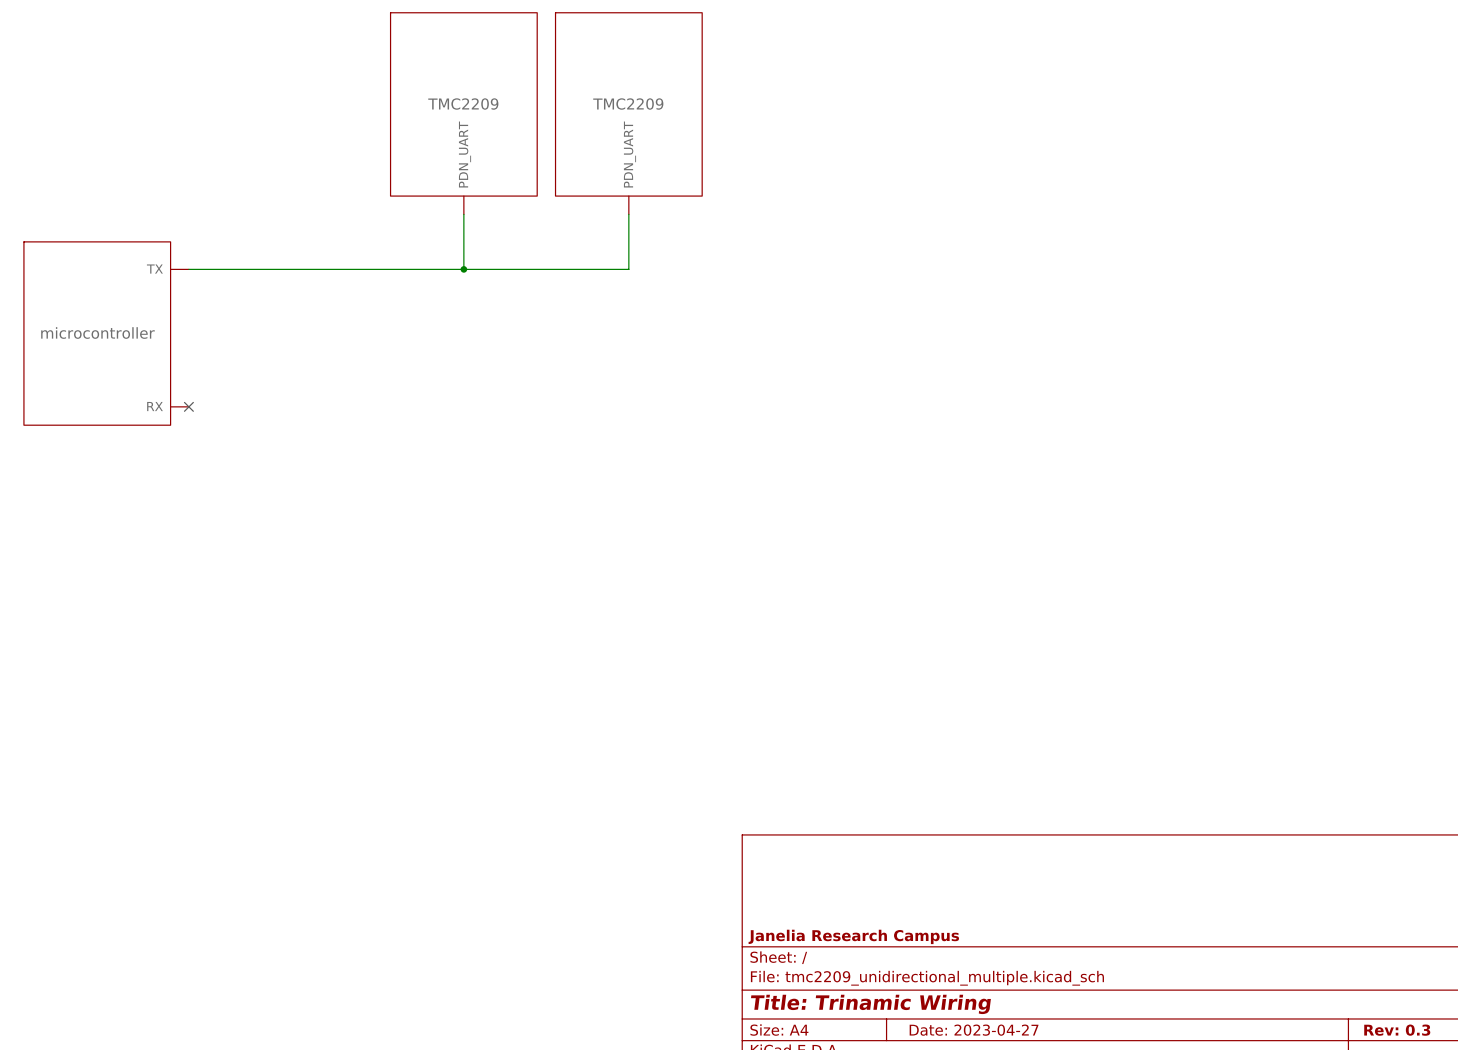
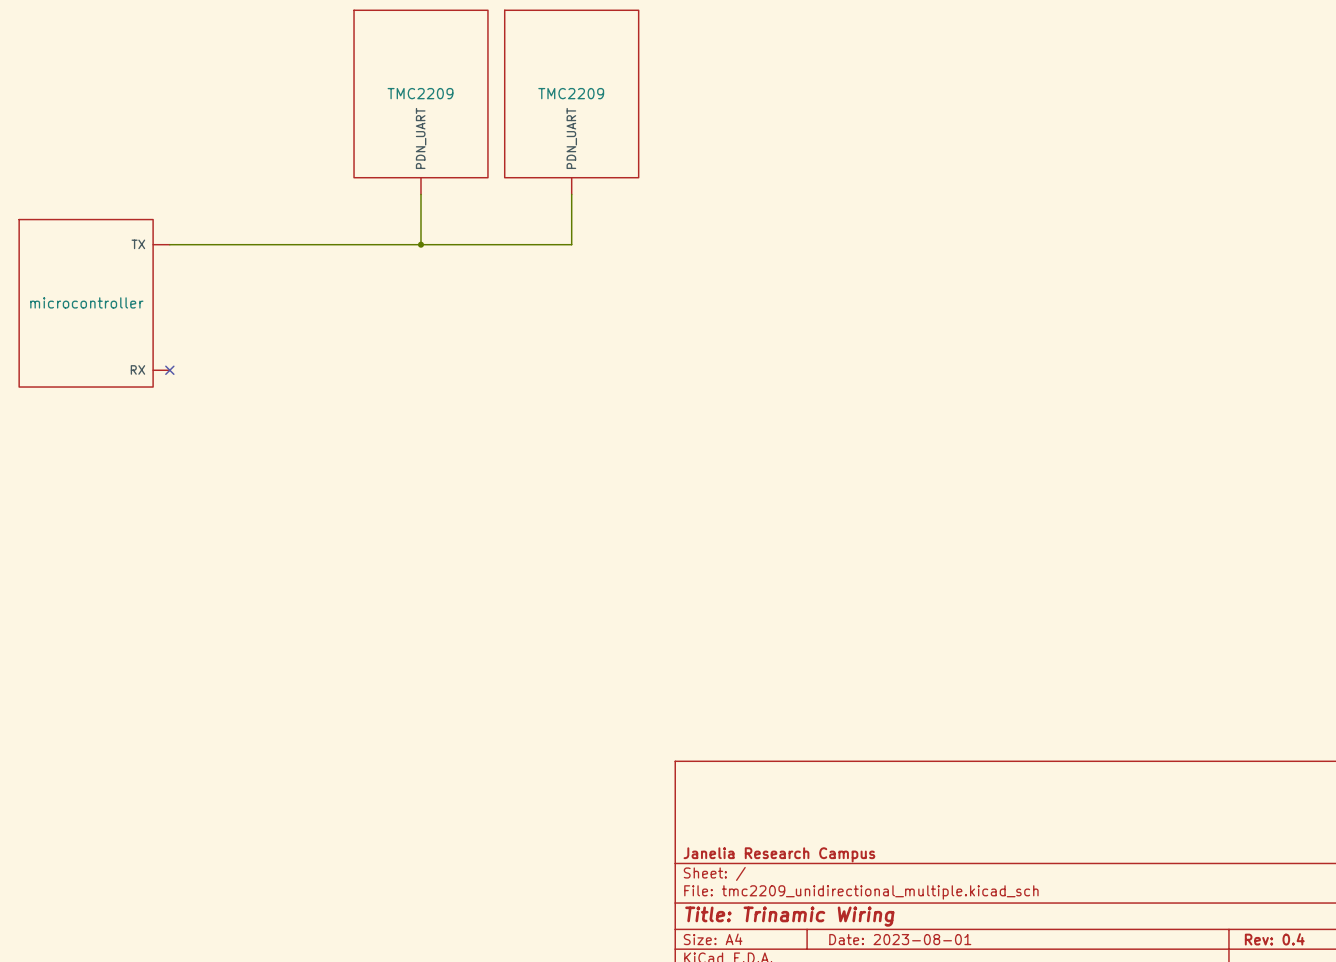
title block: Date: 2023-04-27 (974, 1030) -> Date: 2023-08-01 (900, 939)
title block: Rev: 0.3 (1397, 1030) -> Rev: 0.4 (1274, 939)

